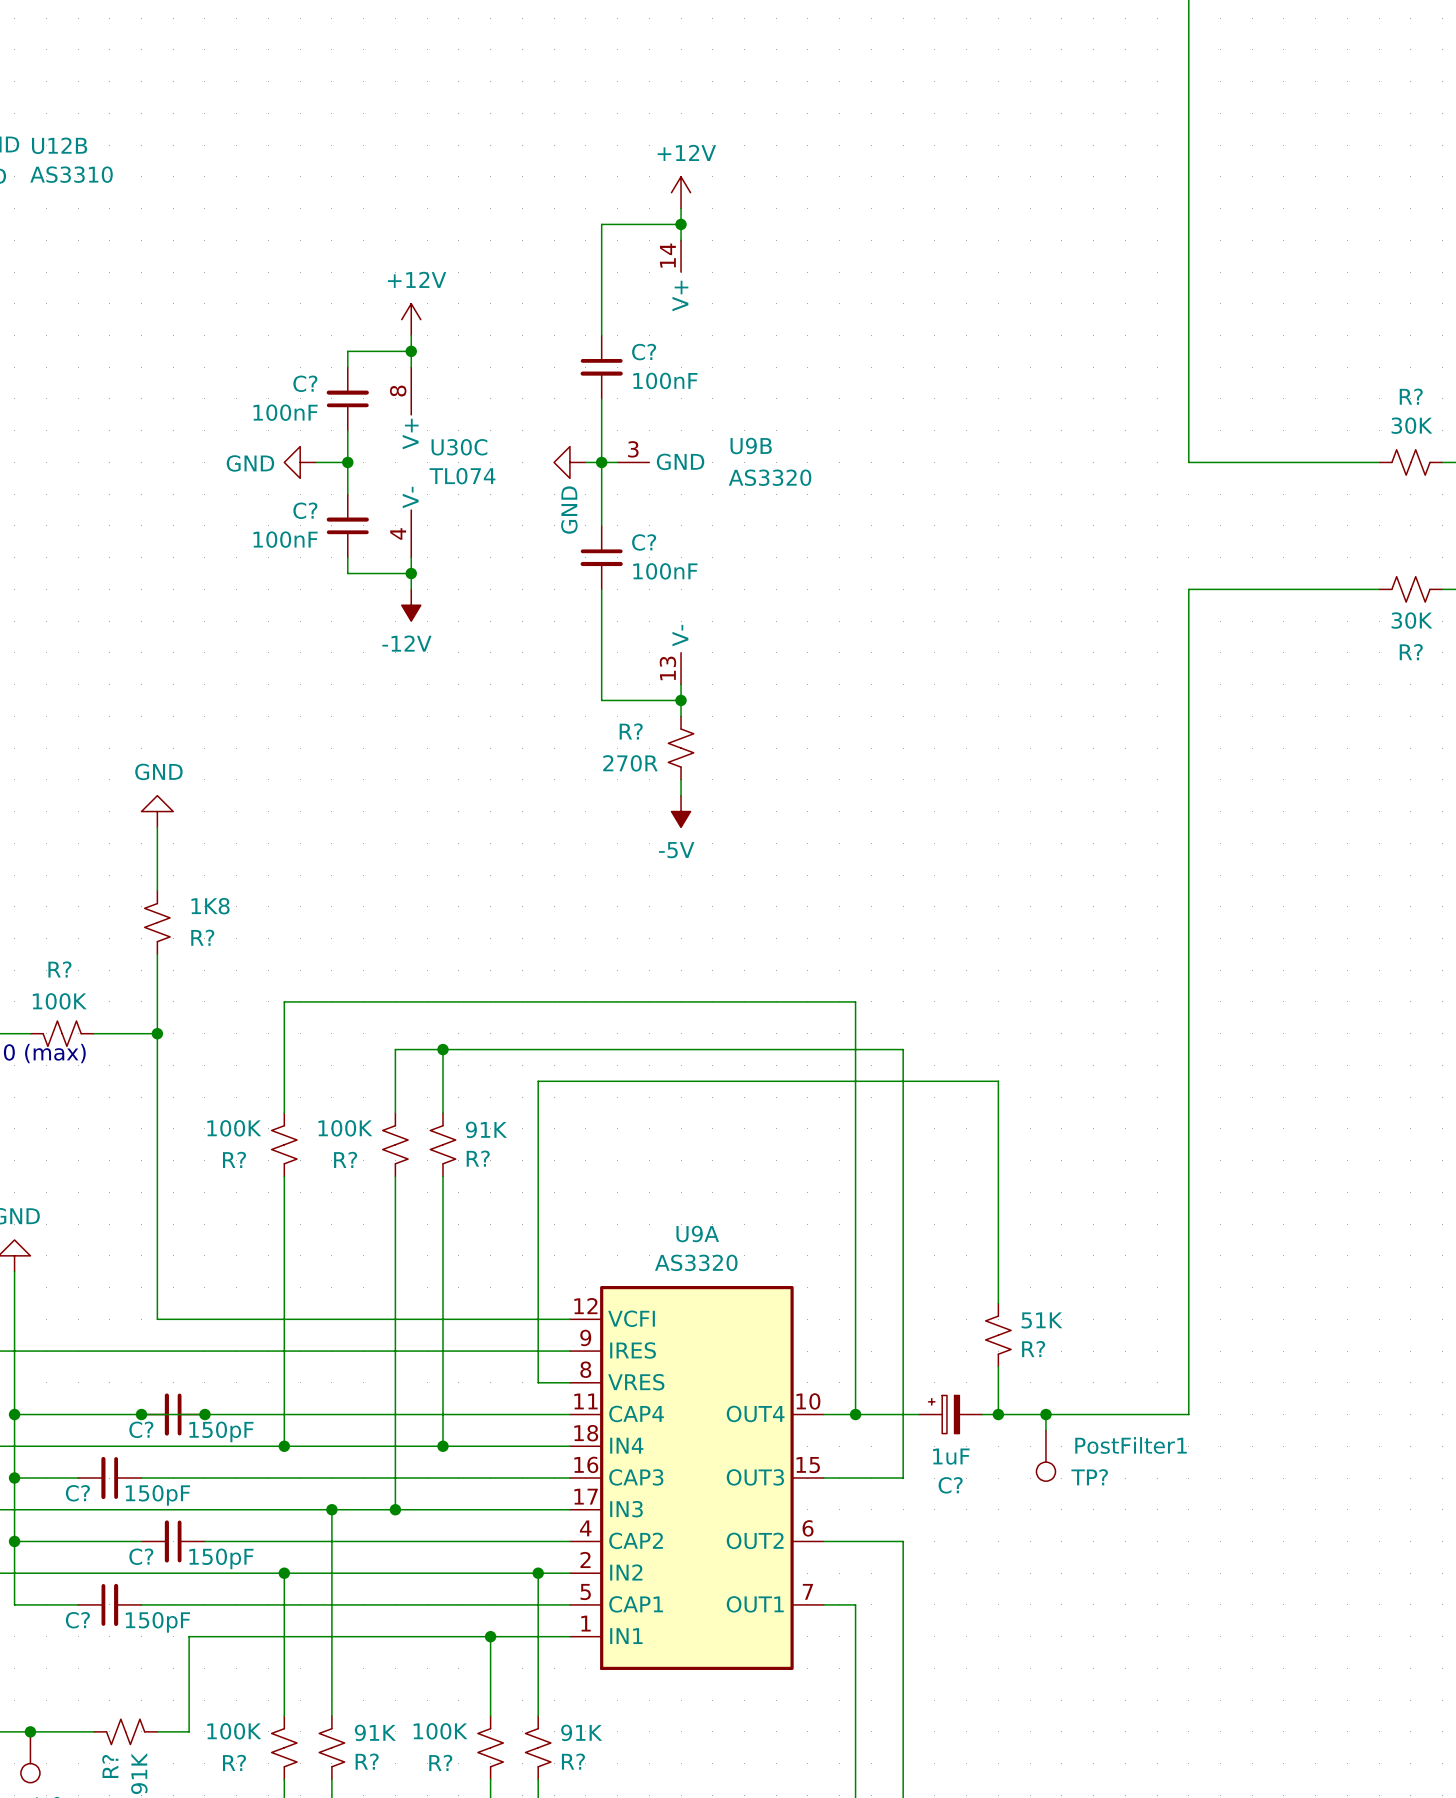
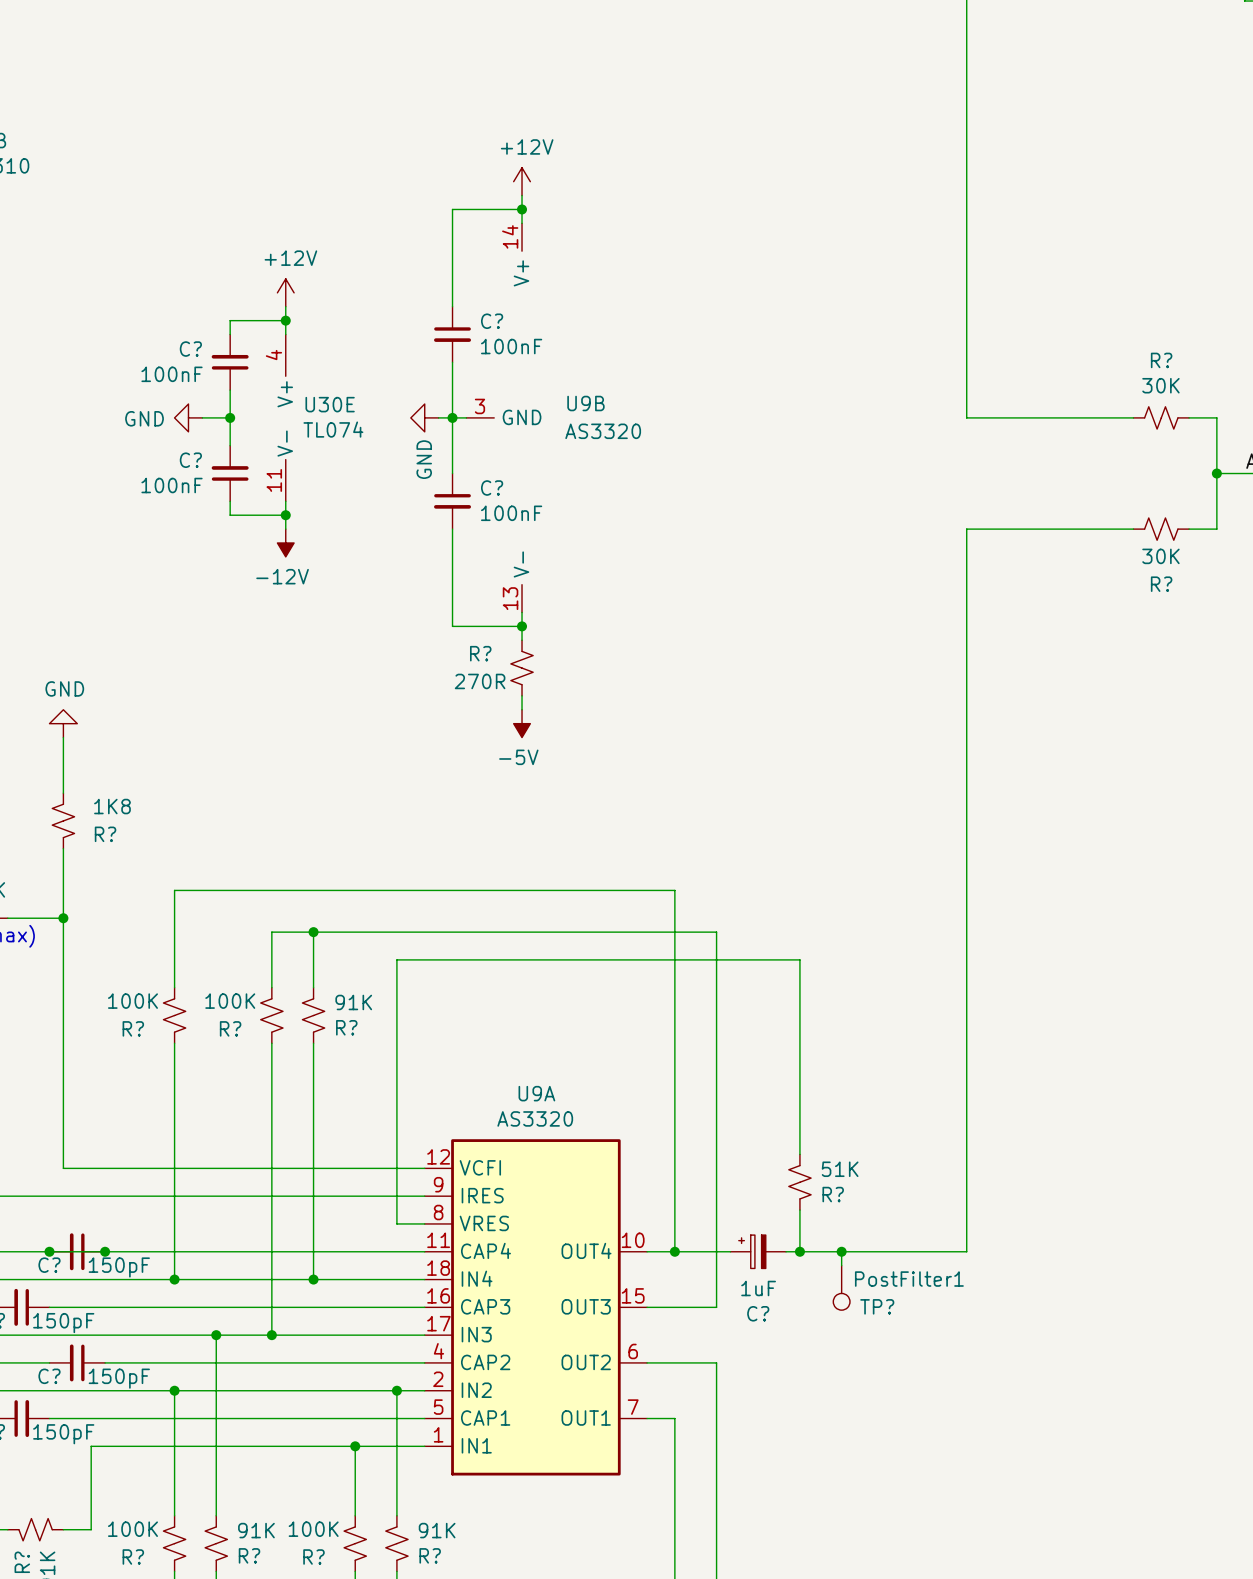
U30C pin number: 8 (398, 391) -> 4 (273, 355)
U30C name: U30C (459, 447) -> U30E (330, 404)
U30C pin number: 4 (398, 533) -> 11 (274, 480)

